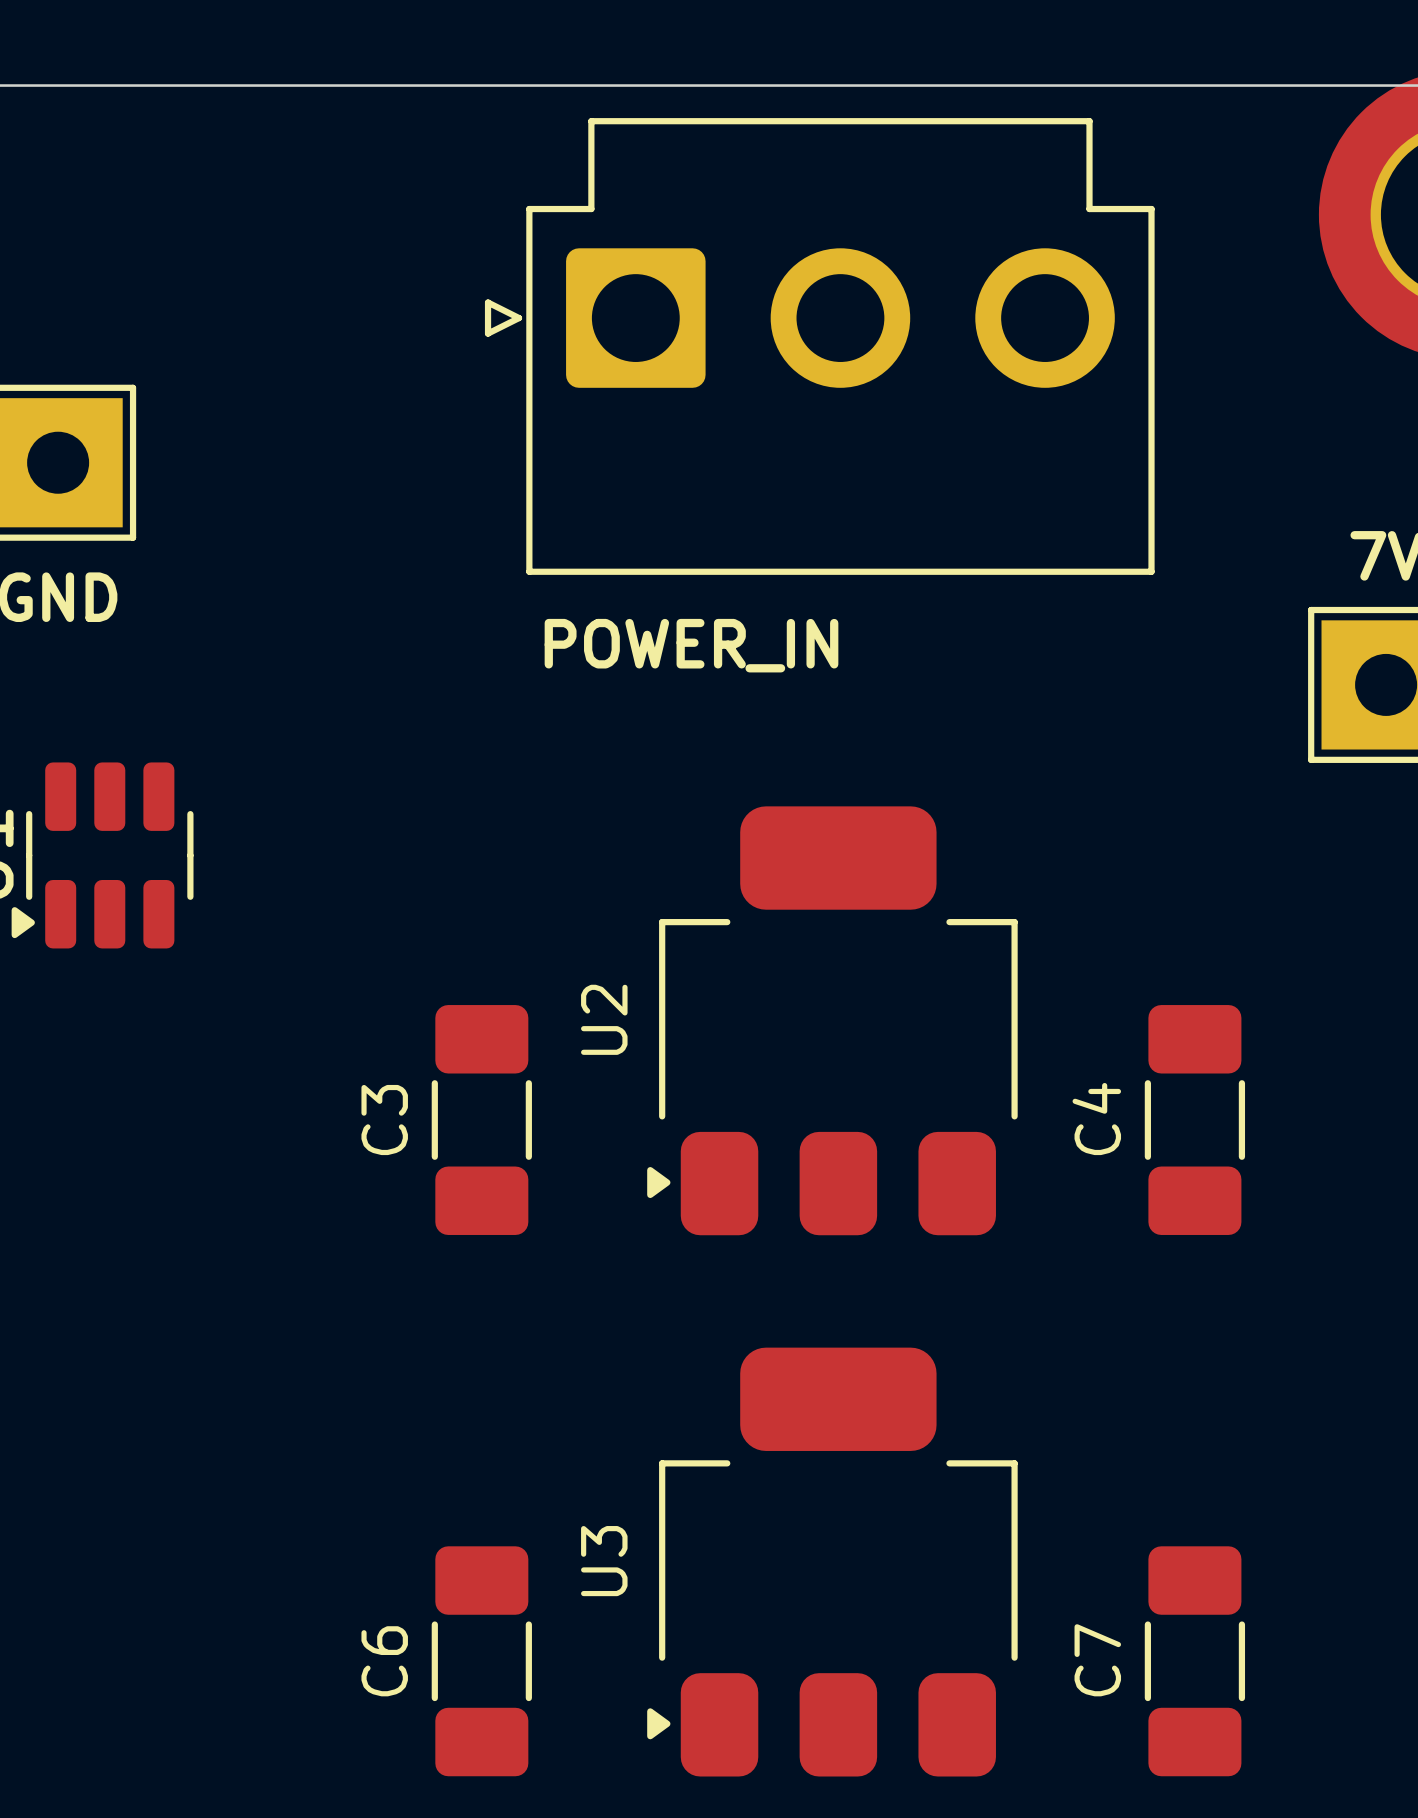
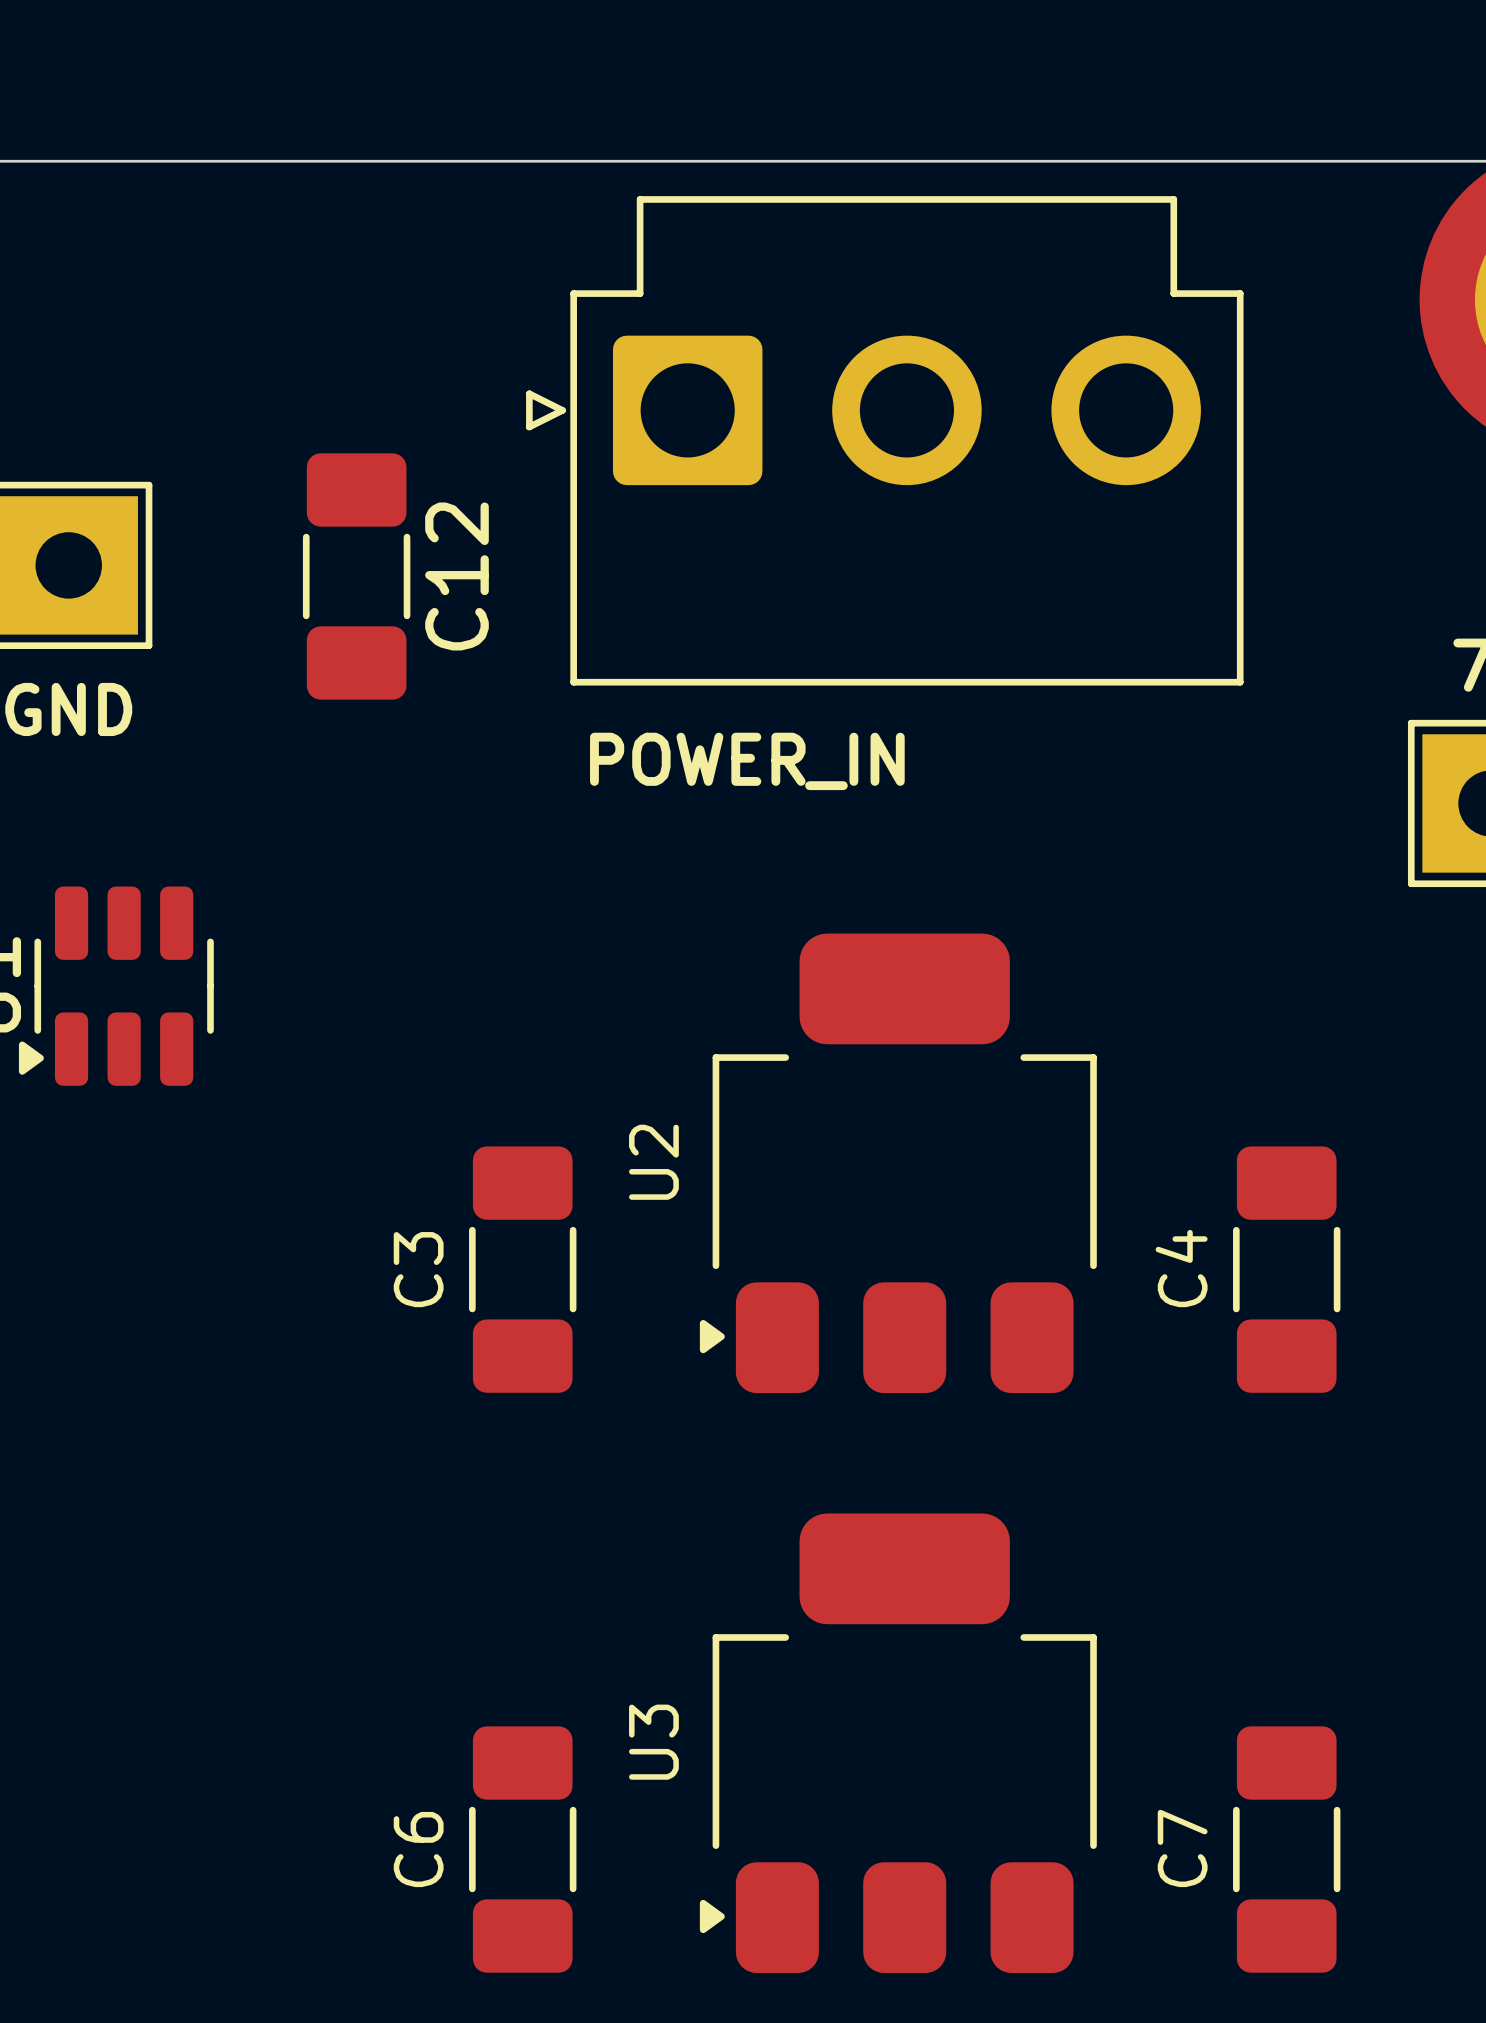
C12: none -> (356, 576)

